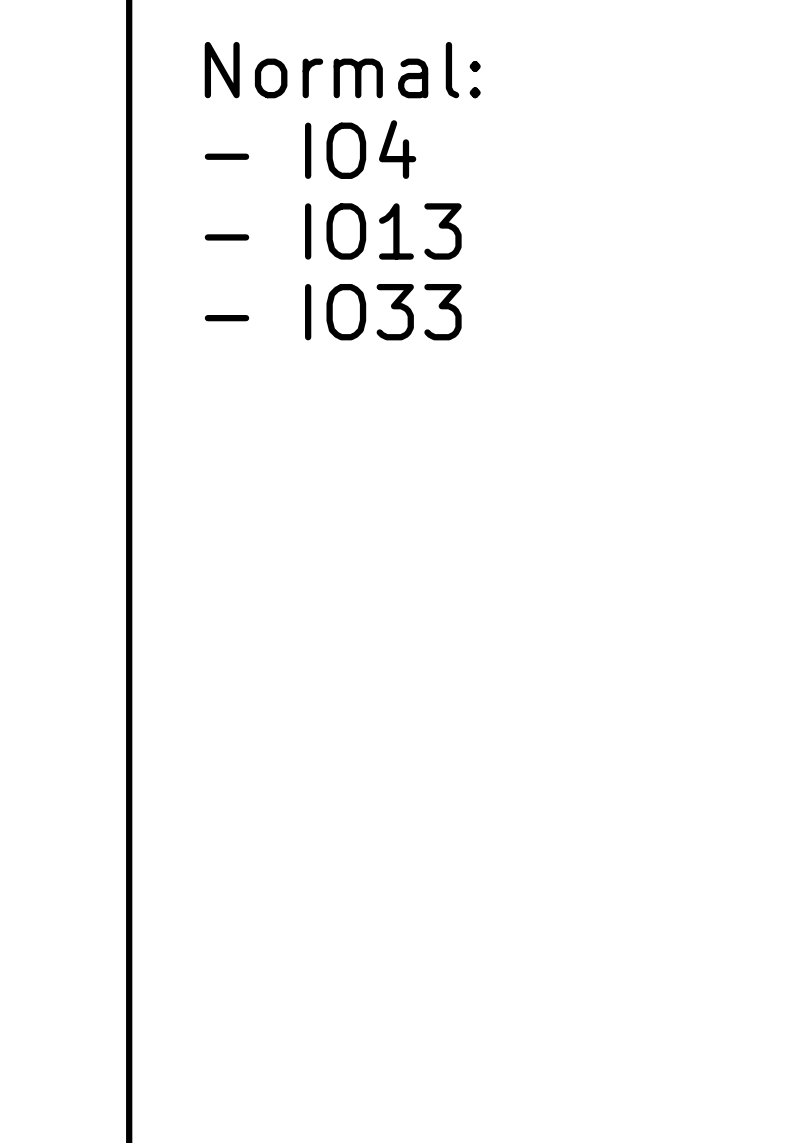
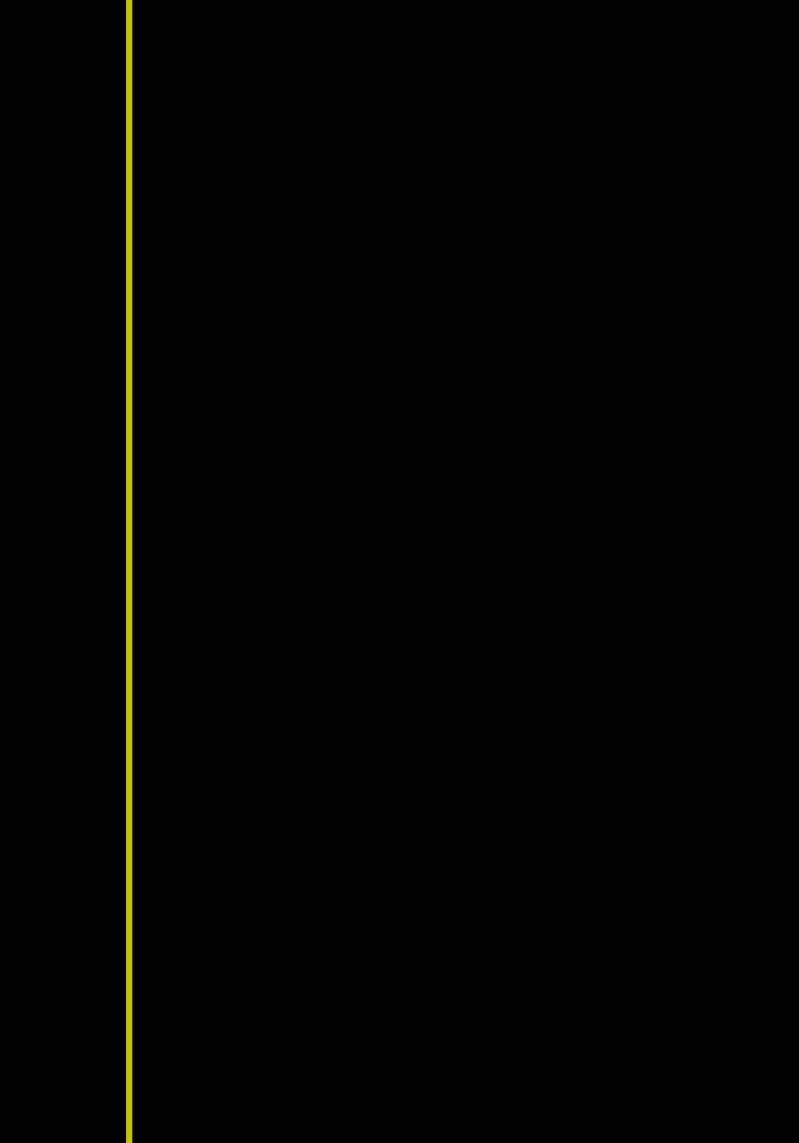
text: Normal: (342, 70) -> none
text: - IO4 (310, 149) -> none
text: - IO13 (333, 231) -> none
text: - IO33 (333, 312) -> none

